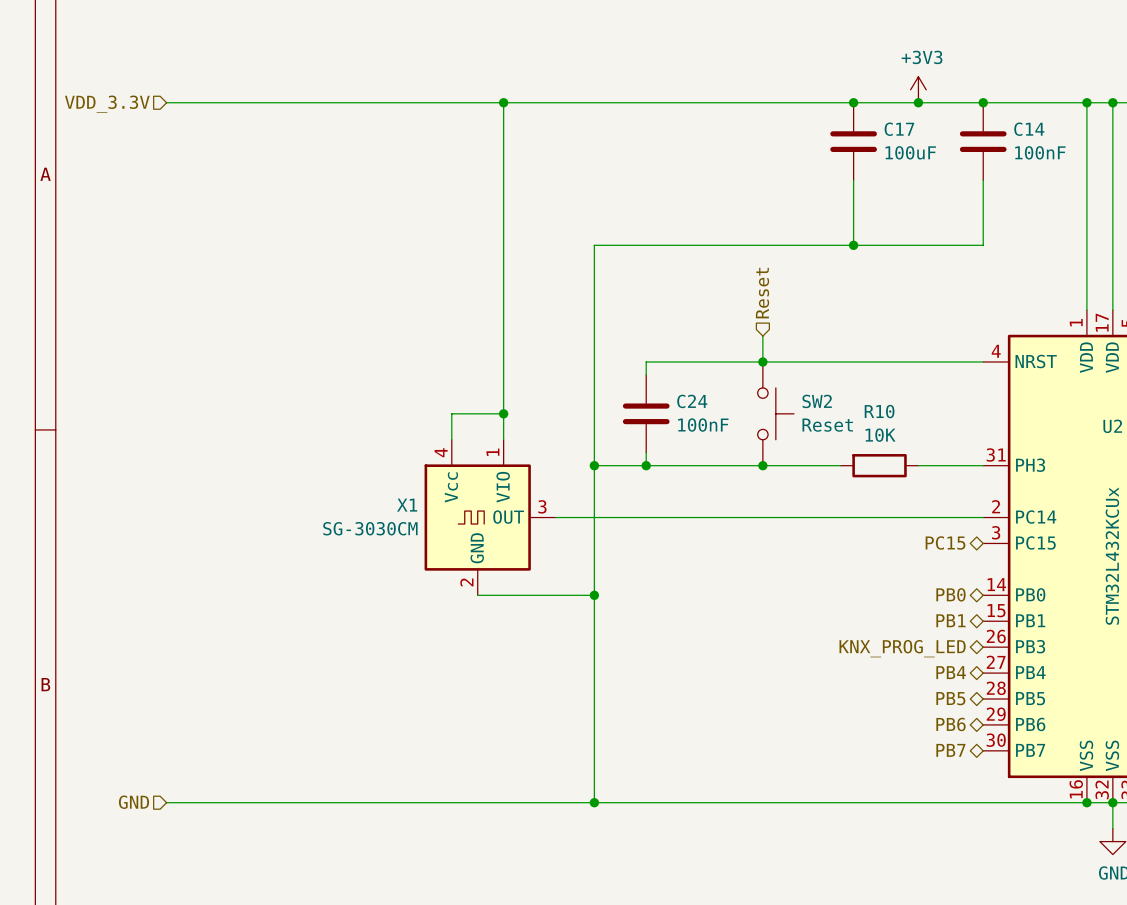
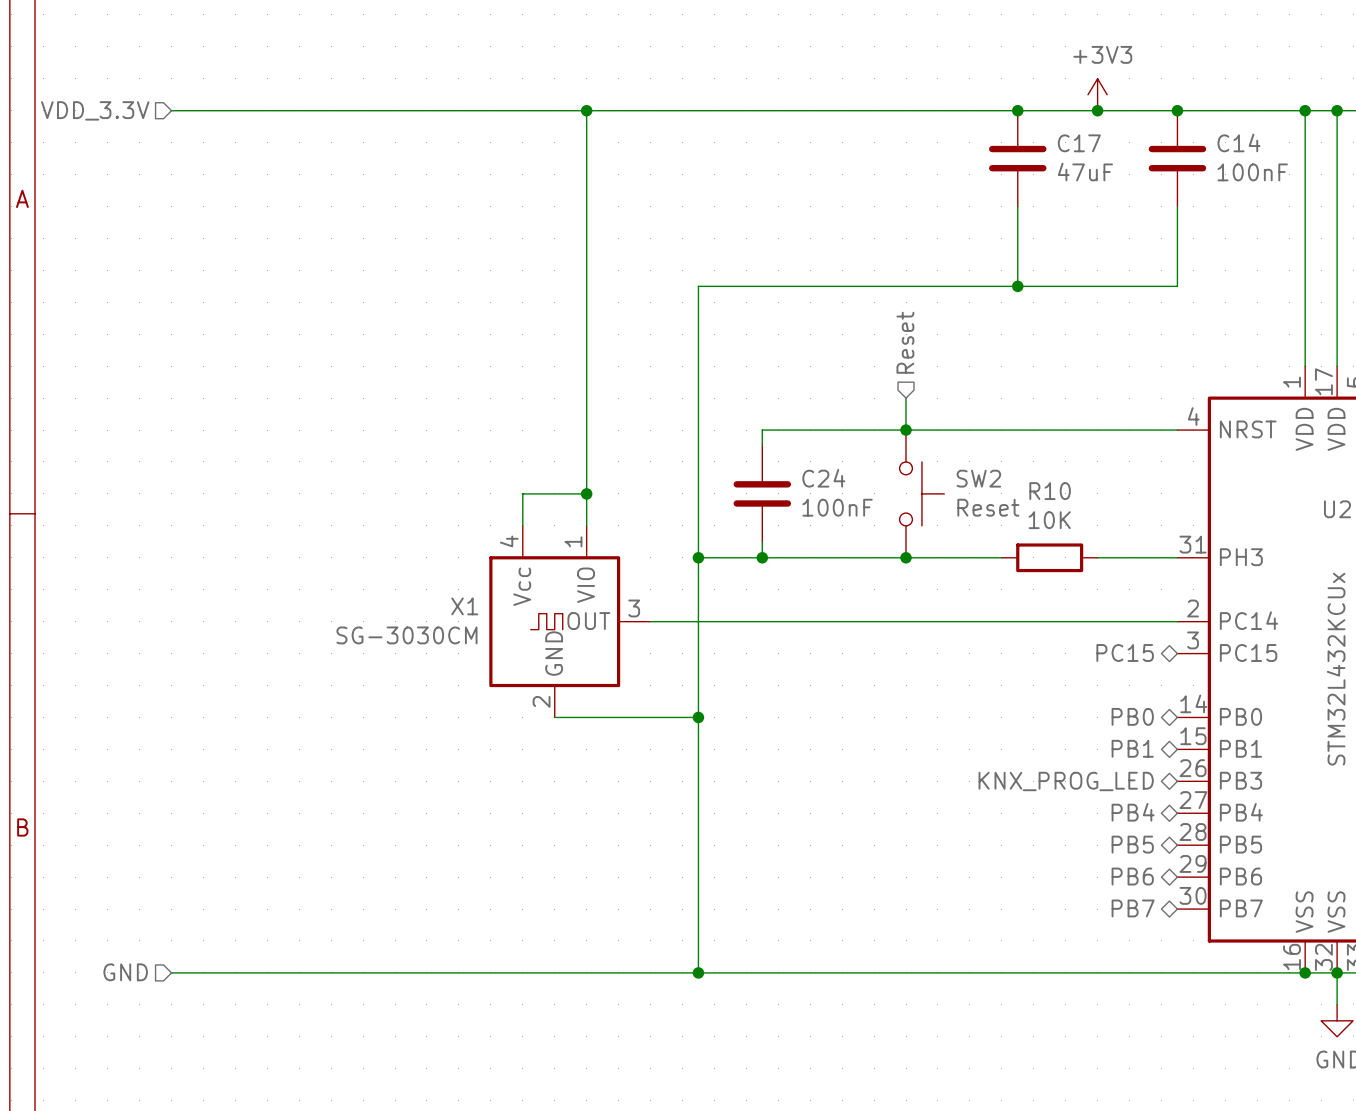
C17 value: 100uF (910, 152) -> 47uF (1085, 172)

